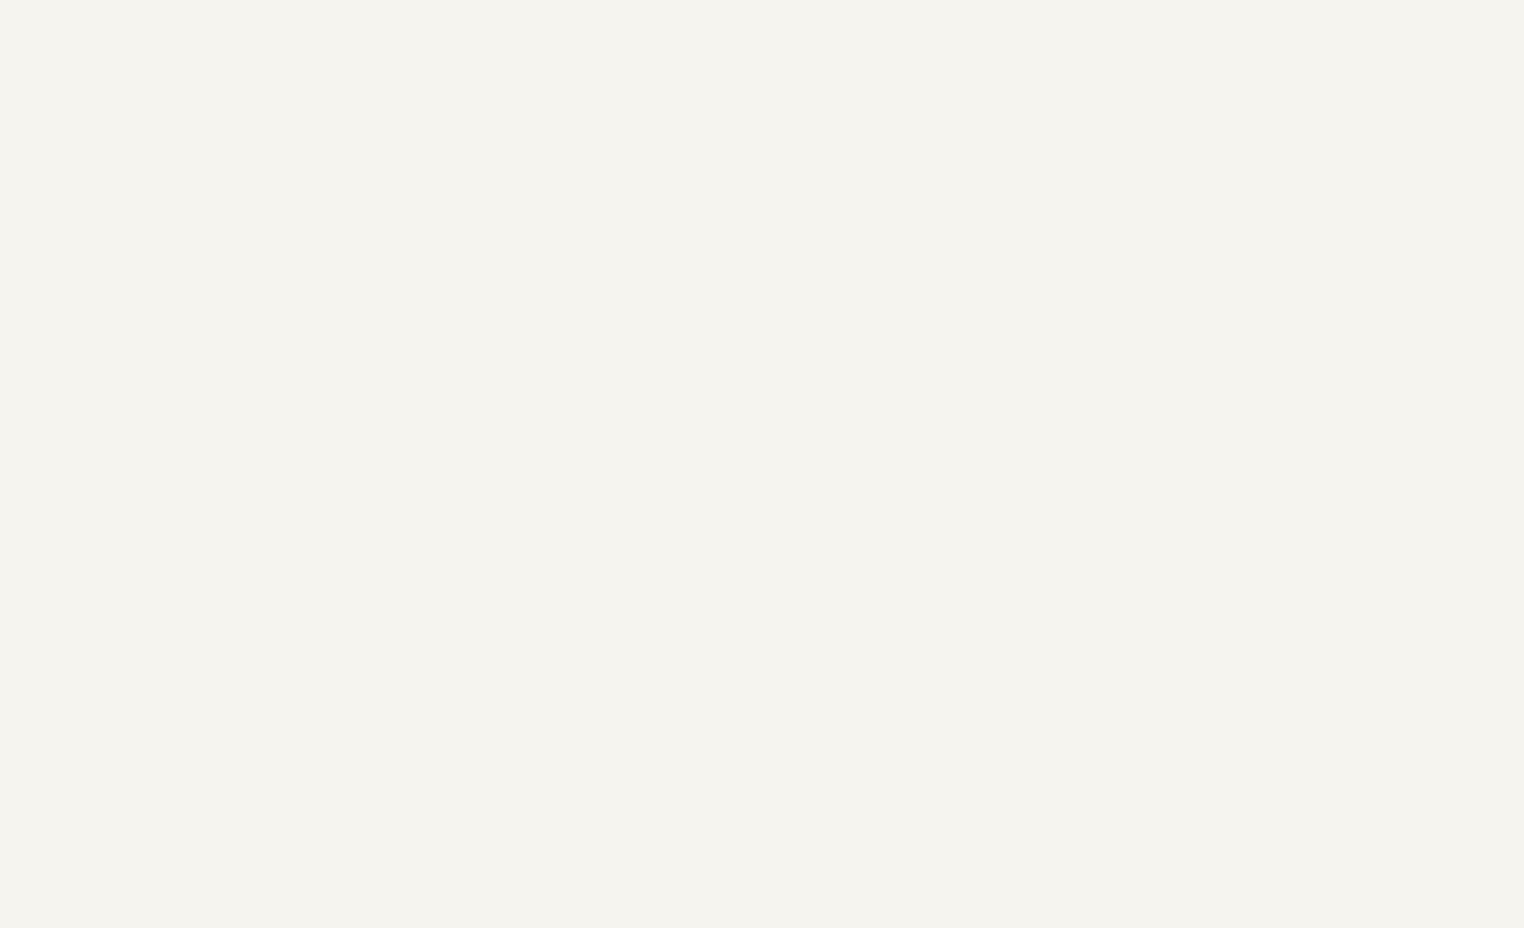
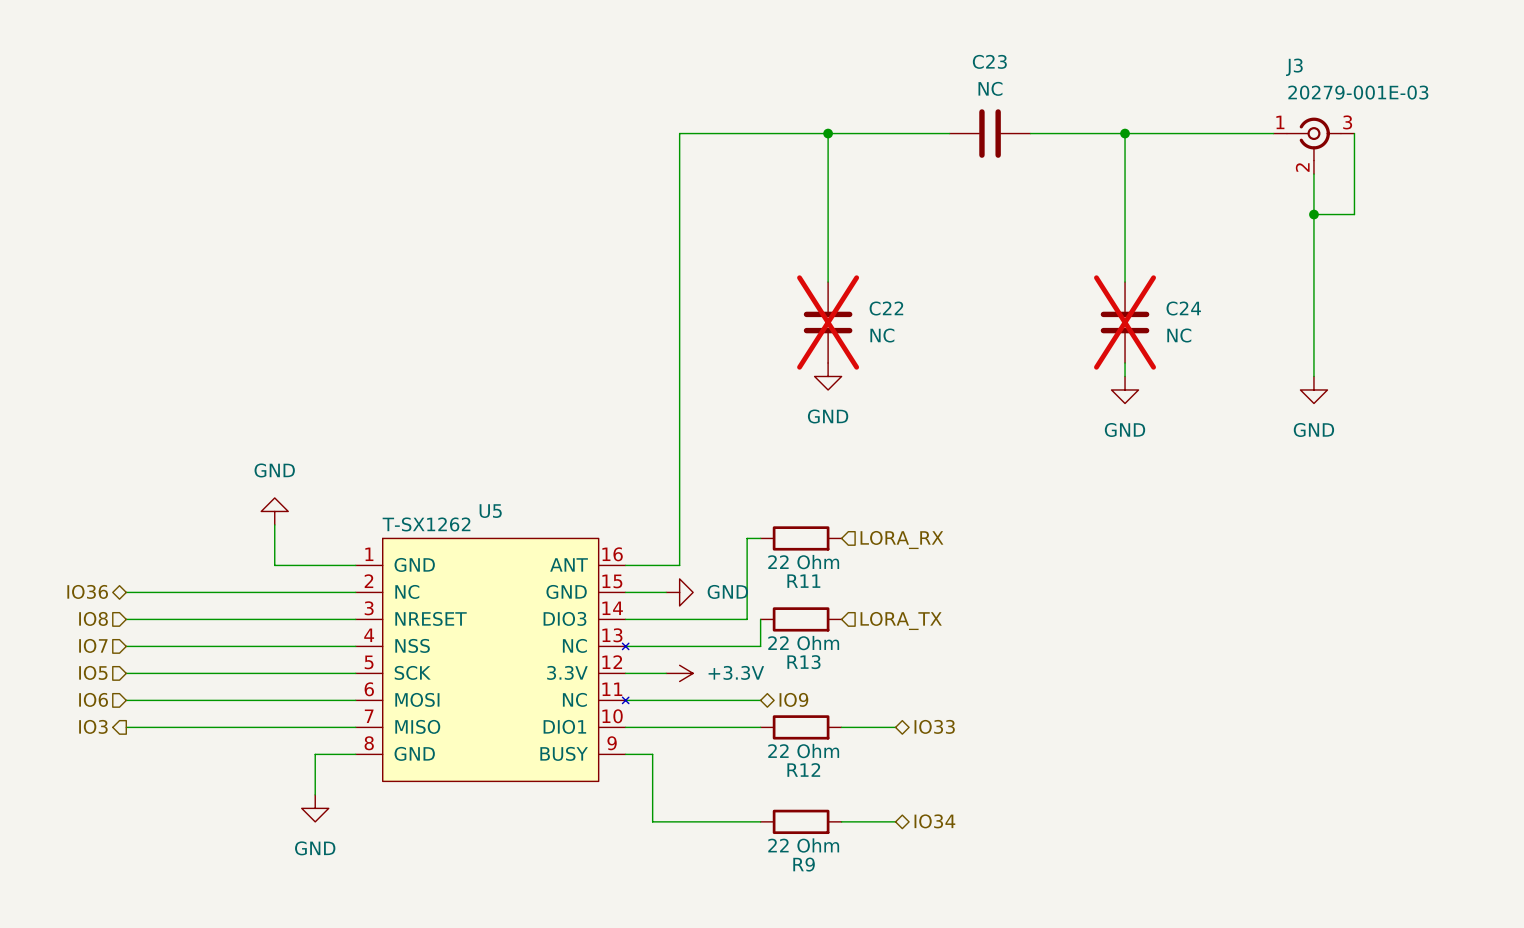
wire: none -> (828, 133) (828, 282)
junction: none -> (828, 133)
wire: none -> (949, 133) (679, 133) (679, 565) (625, 565)
C23: none -> NC (990, 133)
wire: none -> (1030, 133) (1273, 133)
wire: none -> (1125, 133) (1125, 282)
junction: none -> (1125, 133)
wire: none -> (1354, 133) (1354, 214) (1313, 214)
J3: none -> 20279-001E-03 (1313, 145)
wire: none -> (1313, 174) (1313, 376)
junction: none -> (1313, 214)
C22: none -> NC (828, 322)
C24: none -> NC (1125, 322)
wire: none -> (1125, 362) (1125, 376)
power symbol: none -> GND (828, 376)
power symbol: none -> GND (1125, 389)
power symbol: none -> GND (1313, 389)
power symbol: none -> GND (274, 511)
wire: none -> (274, 524) (274, 565) (355, 565)
wire: none -> (760, 538) (747, 538) (747, 619) (625, 619)
R11: none -> 22 Ohm (801, 538)
hierarchical label: none -> LORA_RX (901, 540)
hierarchical label: none -> IO36 (87, 591)
wire: none -> (126, 592) (355, 592)
wire: none -> (625, 592) (666, 592)
power symbol: none -> GND (679, 592)
hierarchical label: none -> IO8 (93, 618)
wire: none -> (126, 619) (355, 619)
wire: none -> (760, 619) (760, 646) (625, 646)
R13: none -> 22 Ohm (801, 619)
hierarchical label: none -> LORA_TX (901, 620)
hierarchical label: none -> IO7 (93, 645)
wire: none -> (126, 646) (355, 646)
U5: none -> T-SX1262 (492, 659)
hierarchical label: none -> IO5 (93, 672)
wire: none -> (126, 673) (355, 673)
wire: none -> (625, 673) (666, 673)
power symbol: none -> +3.3V (679, 673)
hierarchical label: none -> IO6 (93, 699)
hierarchical label: none -> IO9 (793, 699)
wire: none -> (126, 700) (355, 700)
wire: none -> (625, 700) (760, 700)
hierarchical label: none -> IO3 (93, 726)
hierarchical label: none -> IO33 (934, 726)
wire: none -> (126, 727) (355, 727)
wire: none -> (625, 727) (760, 727)
R12: none -> 22 Ohm (801, 727)
wire: none -> (841, 727) (895, 727)
wire: none -> (355, 754) (315, 754) (315, 794)
wire: none -> (625, 754) (652, 754) (652, 821) (760, 821)
power symbol: none -> GND (315, 808)
R9: none -> 22 Ohm (801, 821)
wire: none -> (841, 821) (895, 821)
hierarchical label: none -> IO34 (934, 821)

